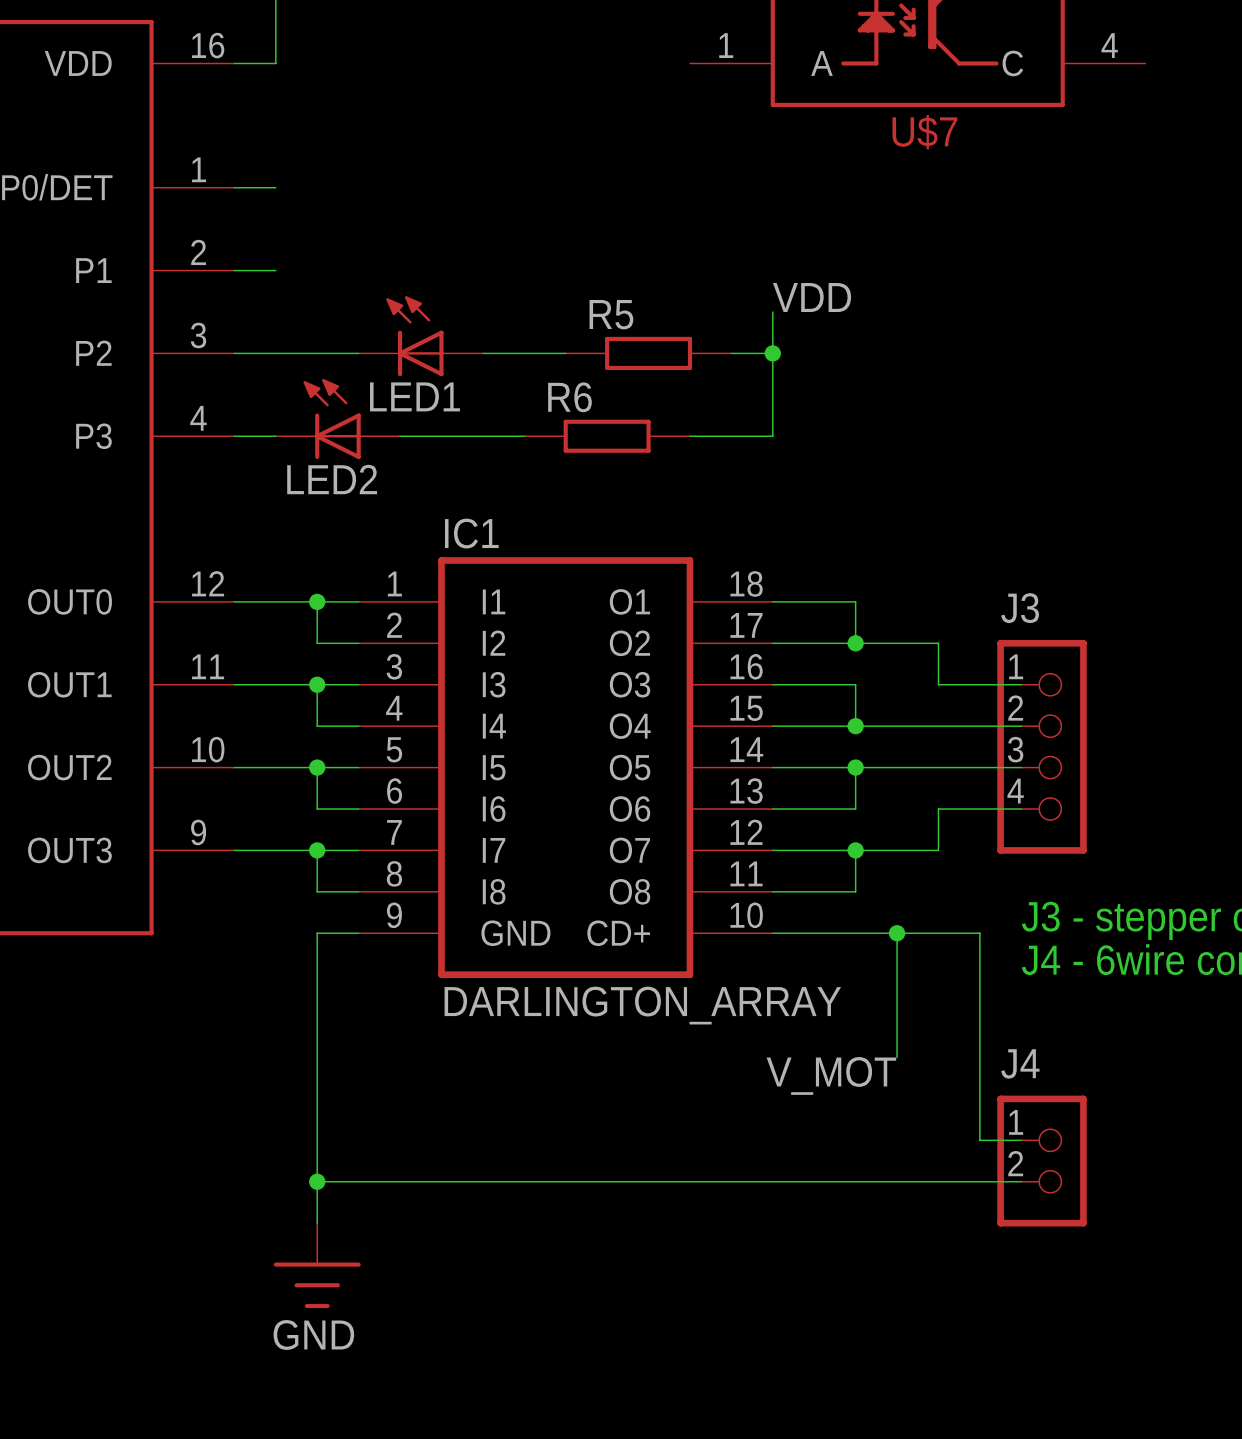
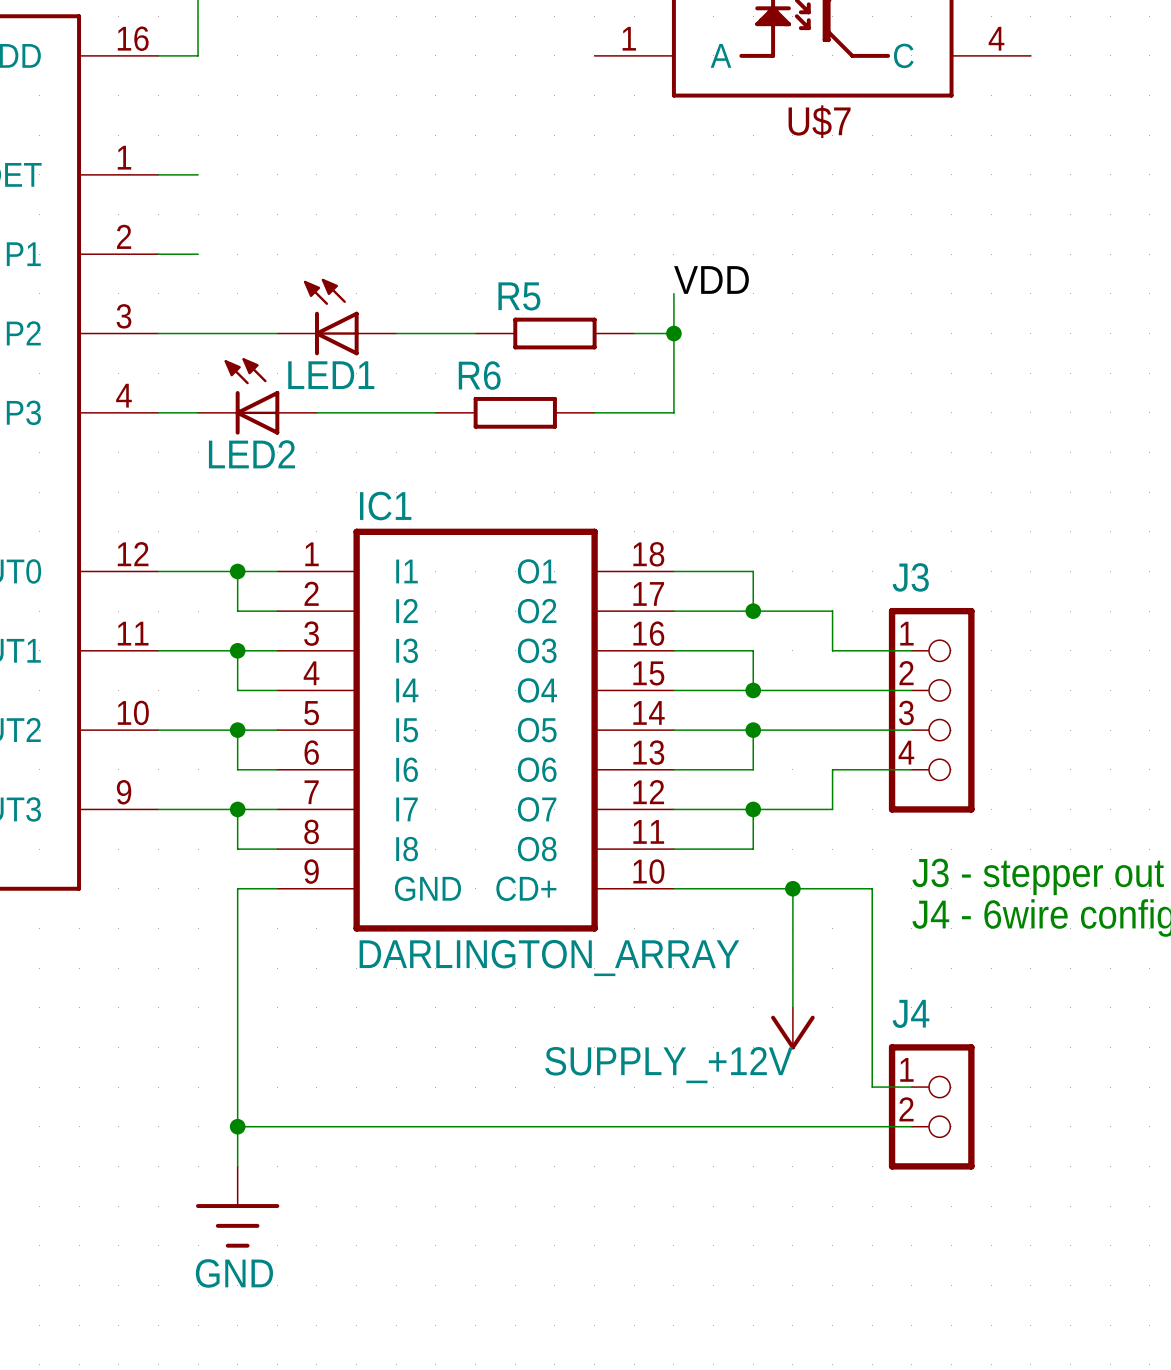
label: V_MOT (831, 1075) -> none
power symbol: none -> SUPPLY_+12V (792, 1028)

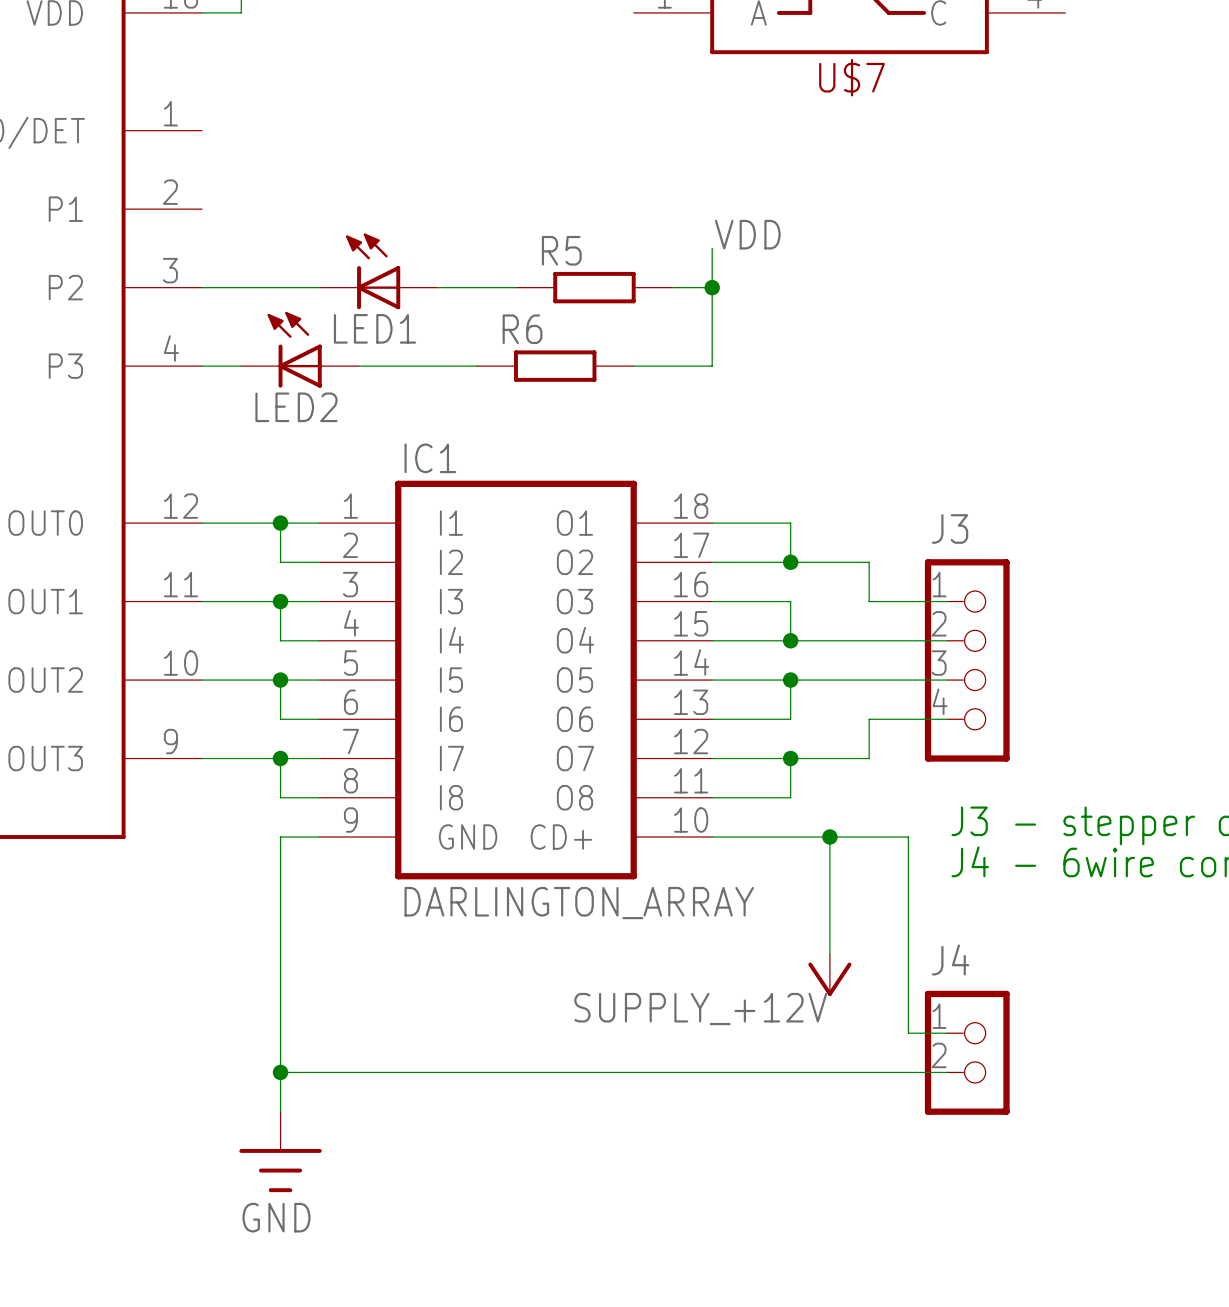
wire: (158, 174) (198, 174) -> none
wire: (158, 254) (198, 254) -> none

